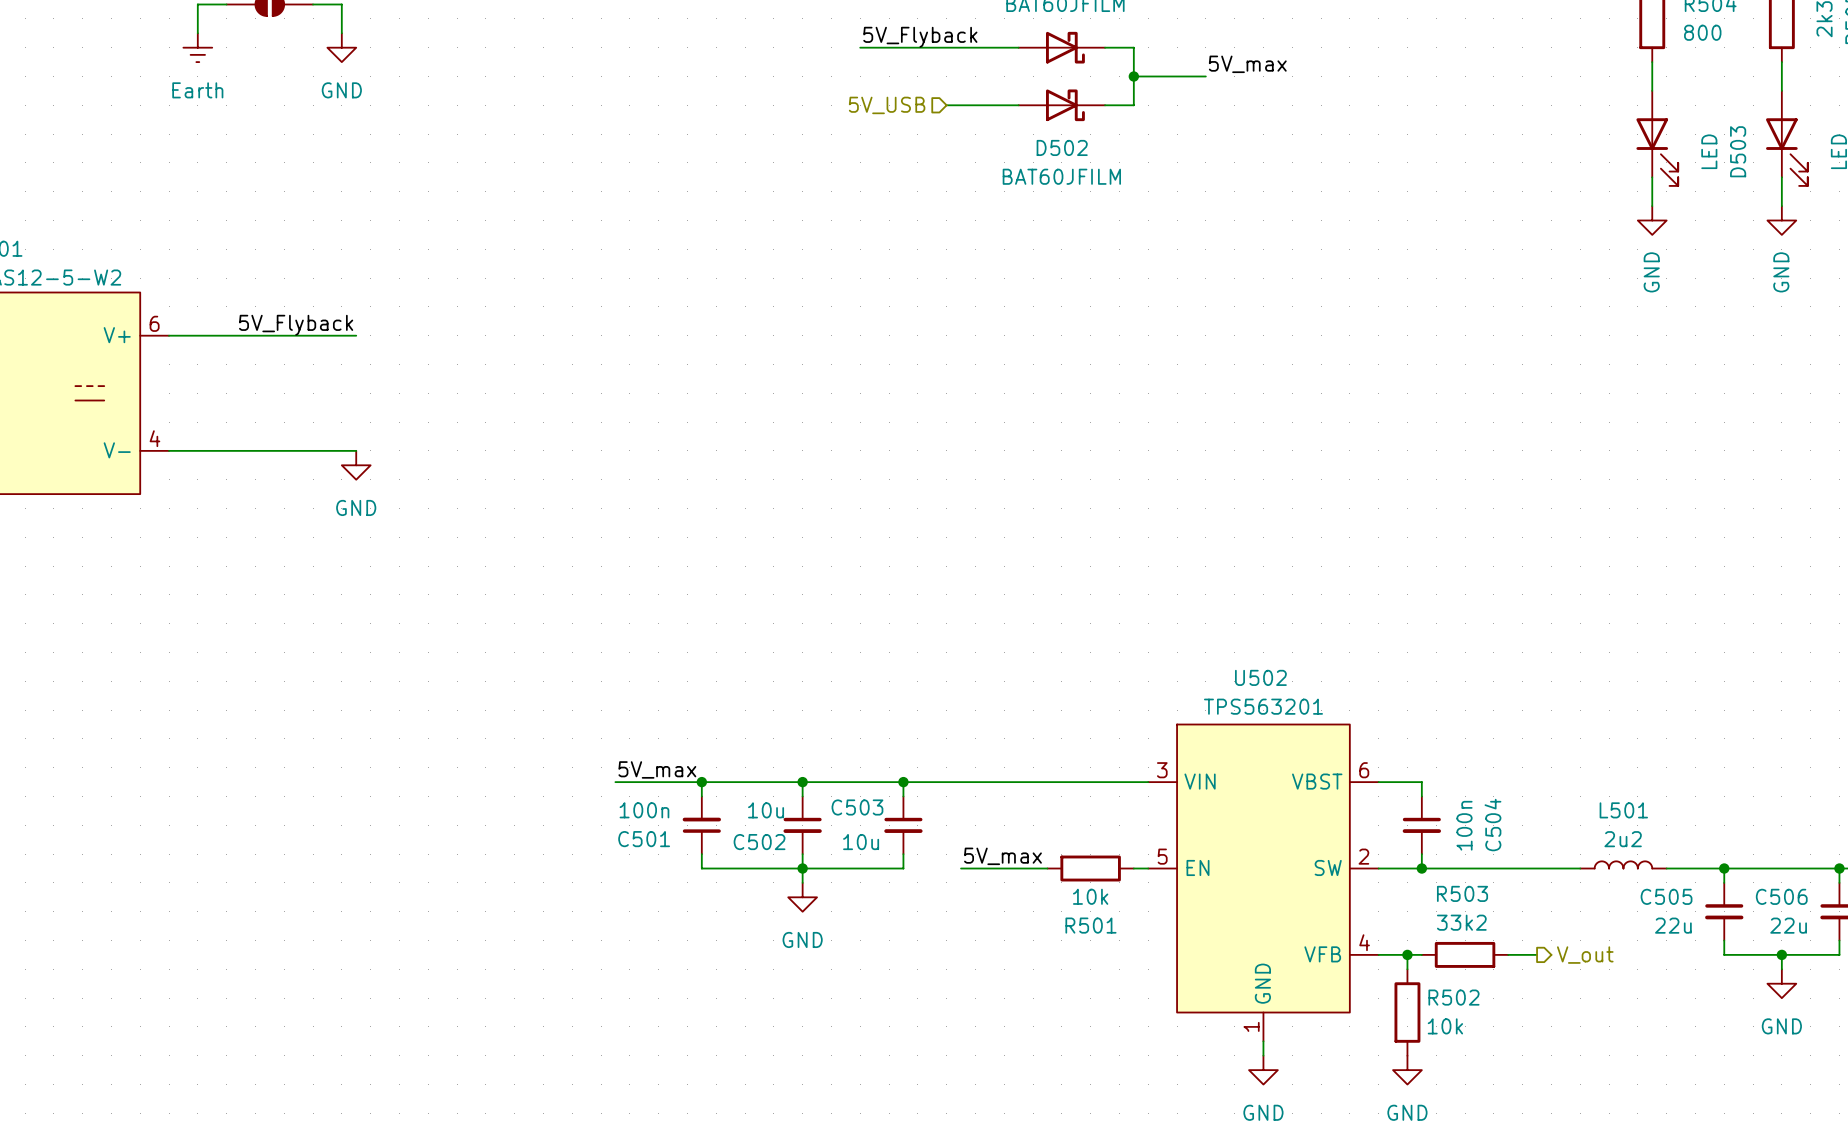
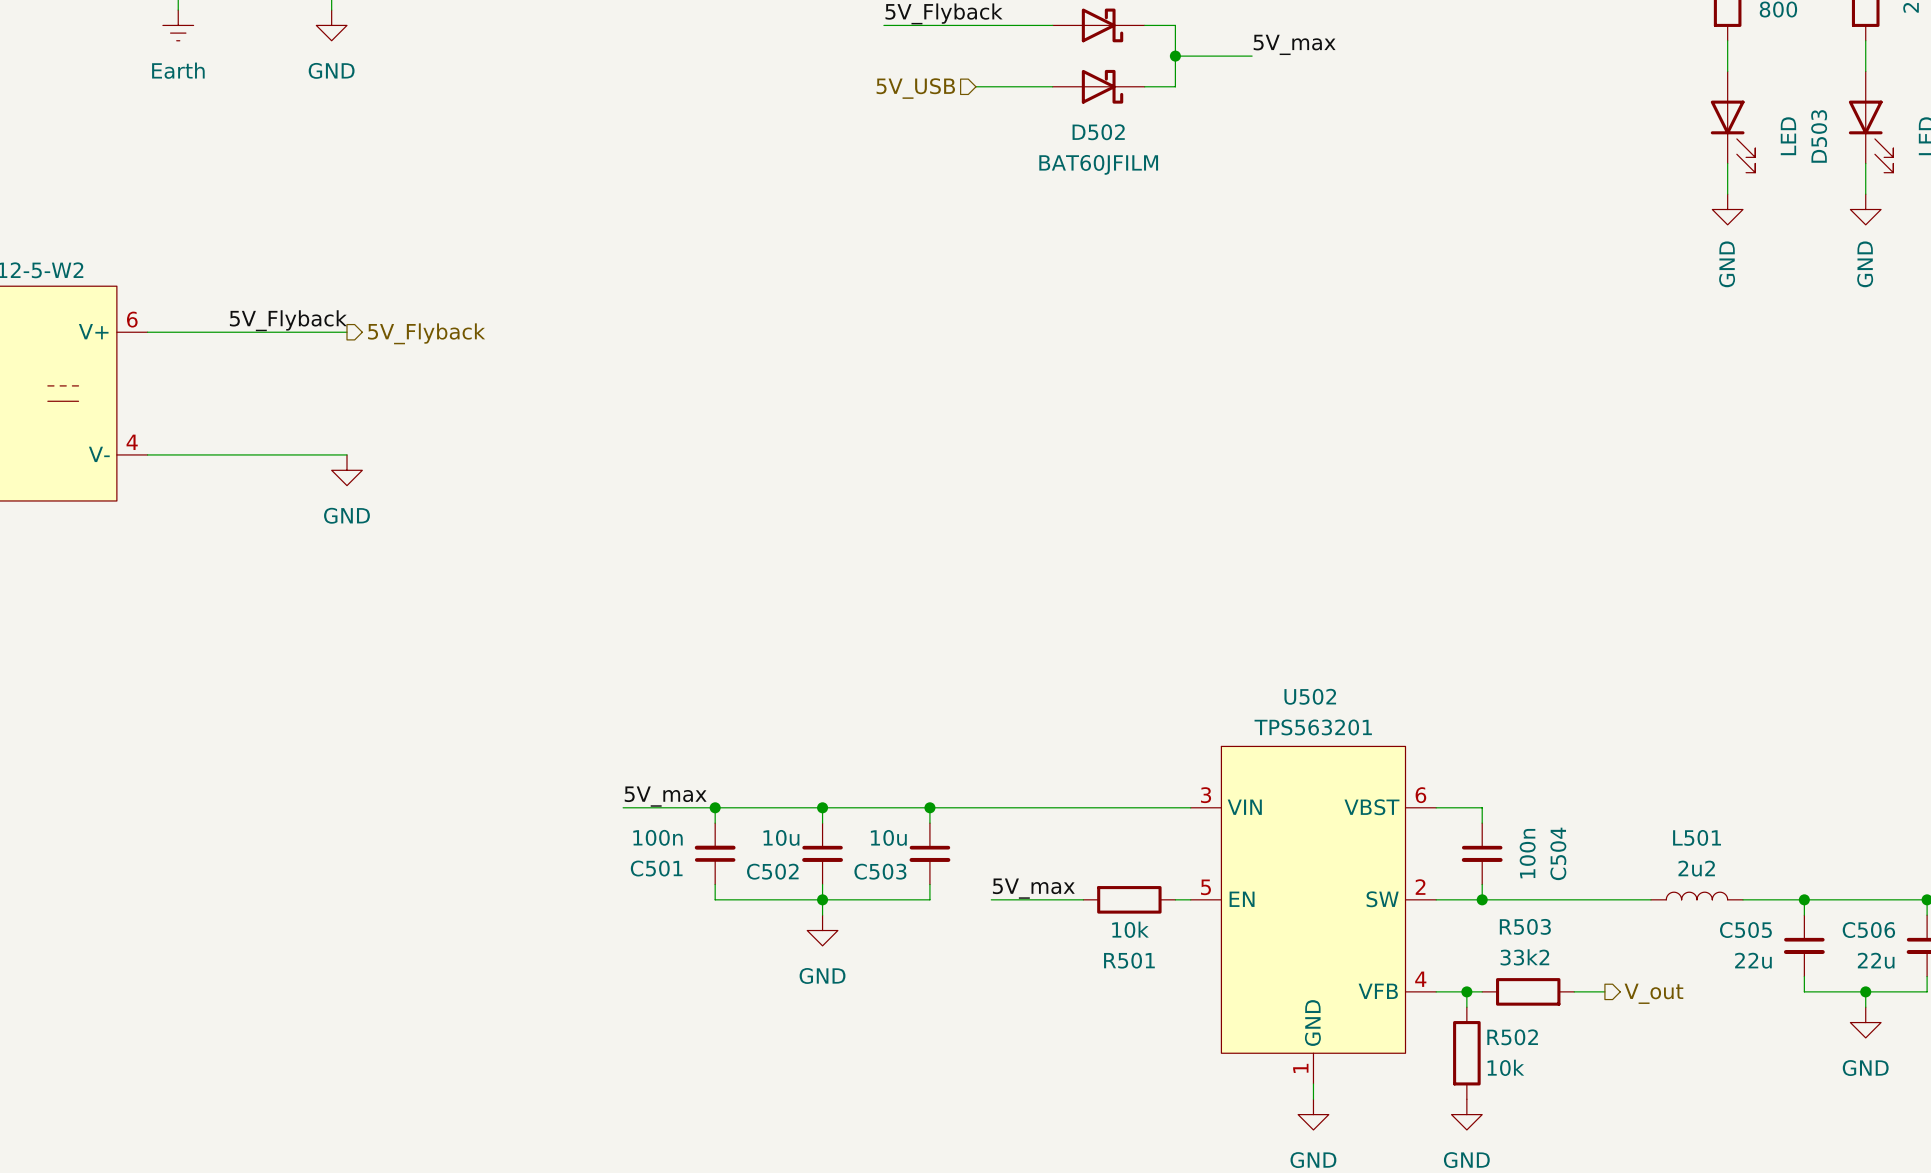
hierarchical label: none -> 5V_Flyback (426, 333)
C503 name position: C503 (857, 807) -> C503 (880, 871)
C503 value position: 10u (861, 842) -> 10u (888, 837)

